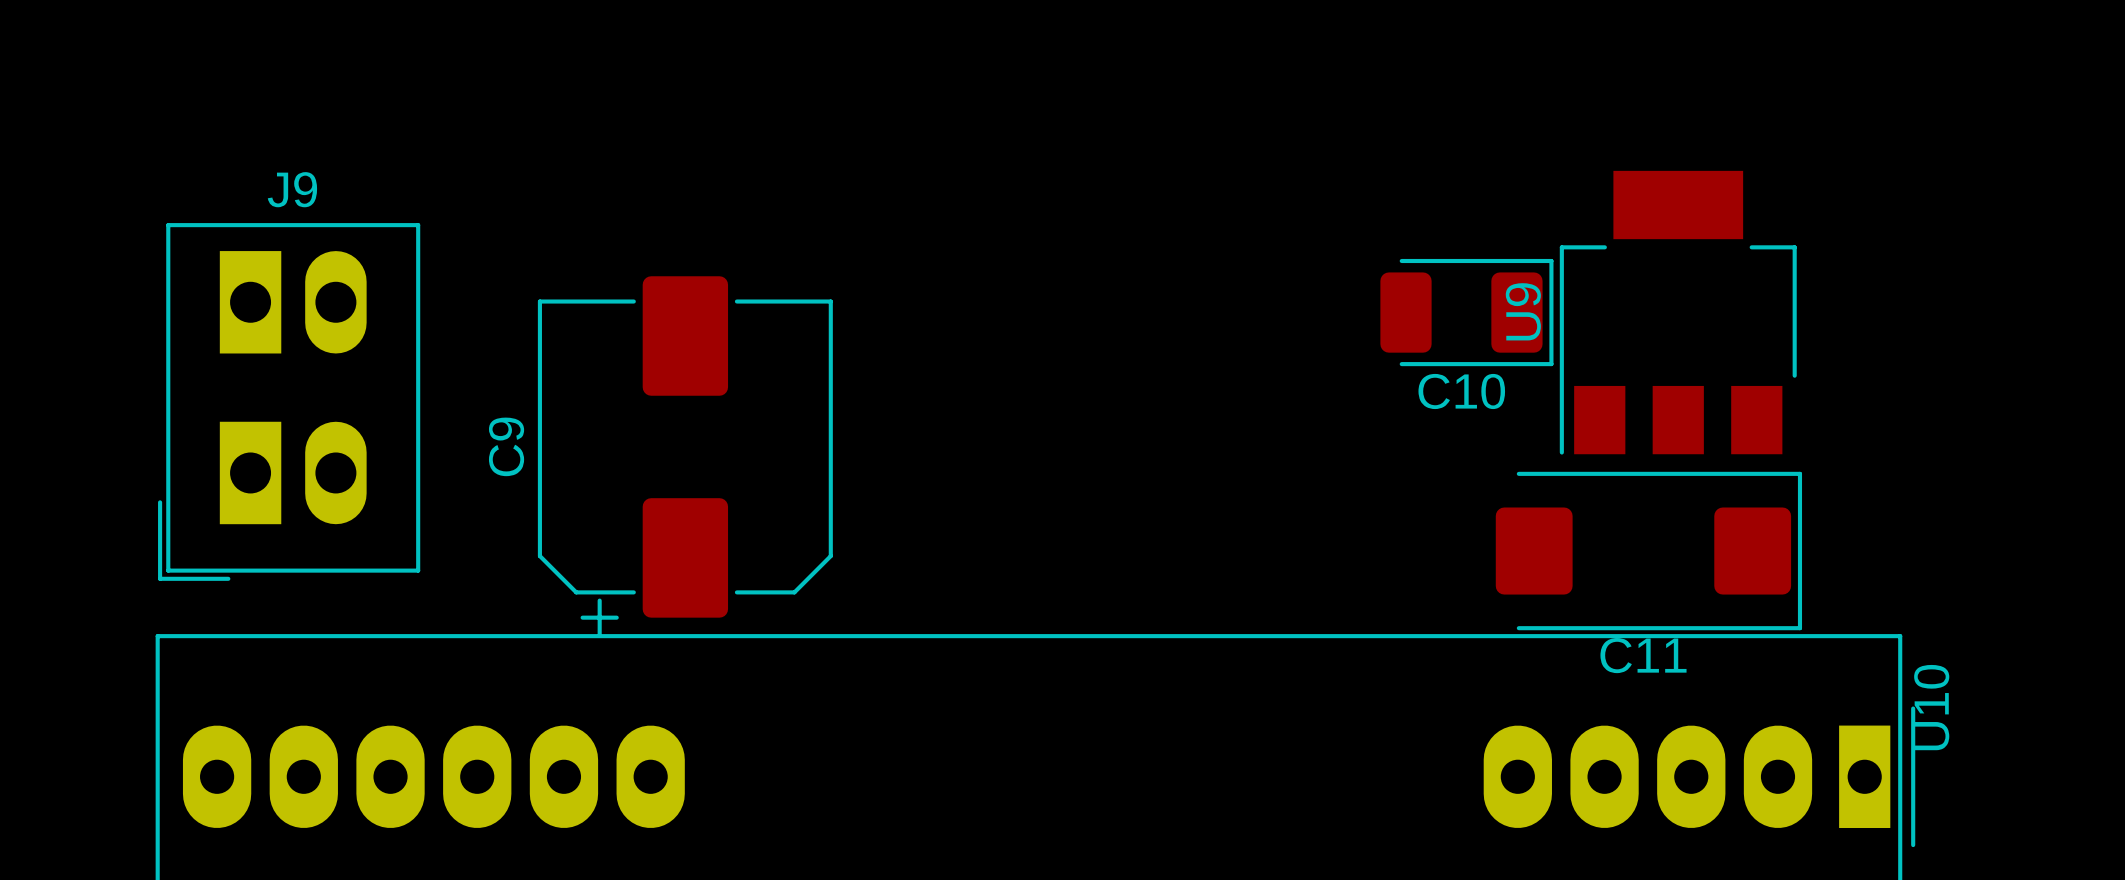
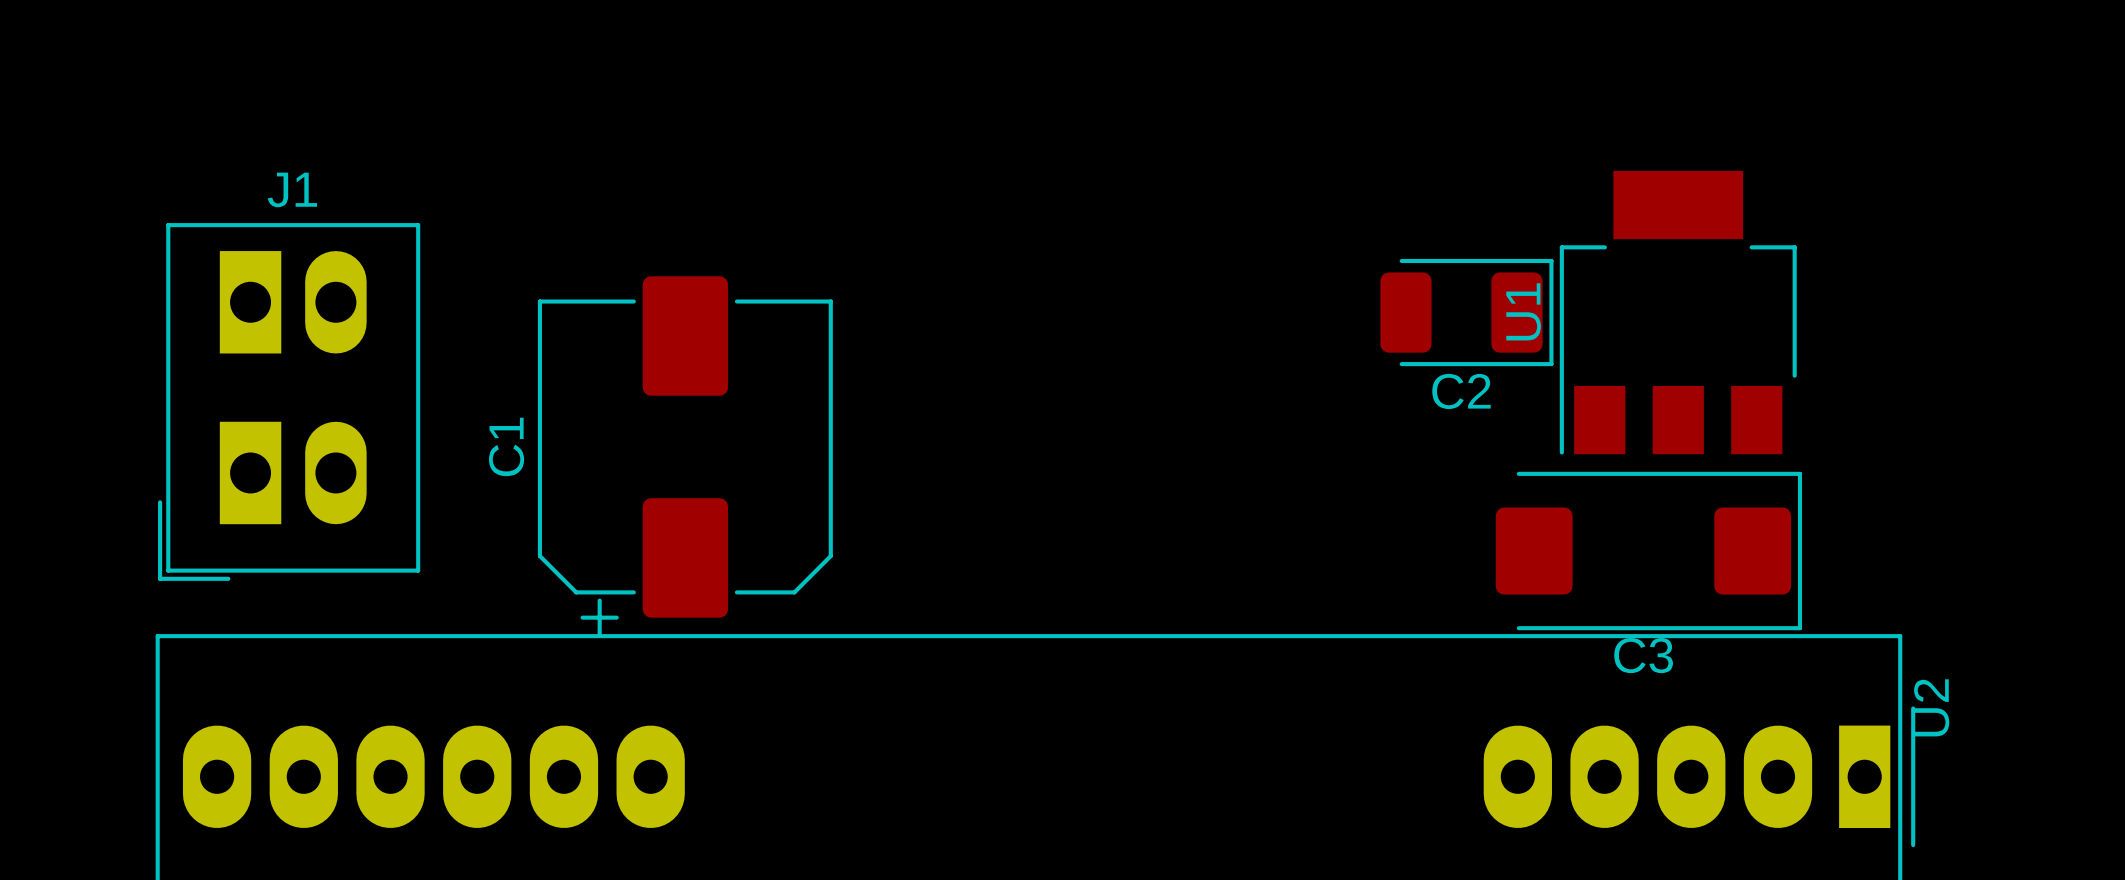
J9 name: J9 (292, 189) -> J1 (292, 189)
U9 name: U9 (1523, 311) -> U1 (1523, 311)
C10 name: C10 (1461, 391) -> C2 (1461, 391)
C9 name: C9 (506, 446) -> C1 (506, 446)
C11 name: C11 (1643, 655) -> C3 (1643, 655)
U10 name: U10 (1931, 707) -> U2 (1931, 707)

